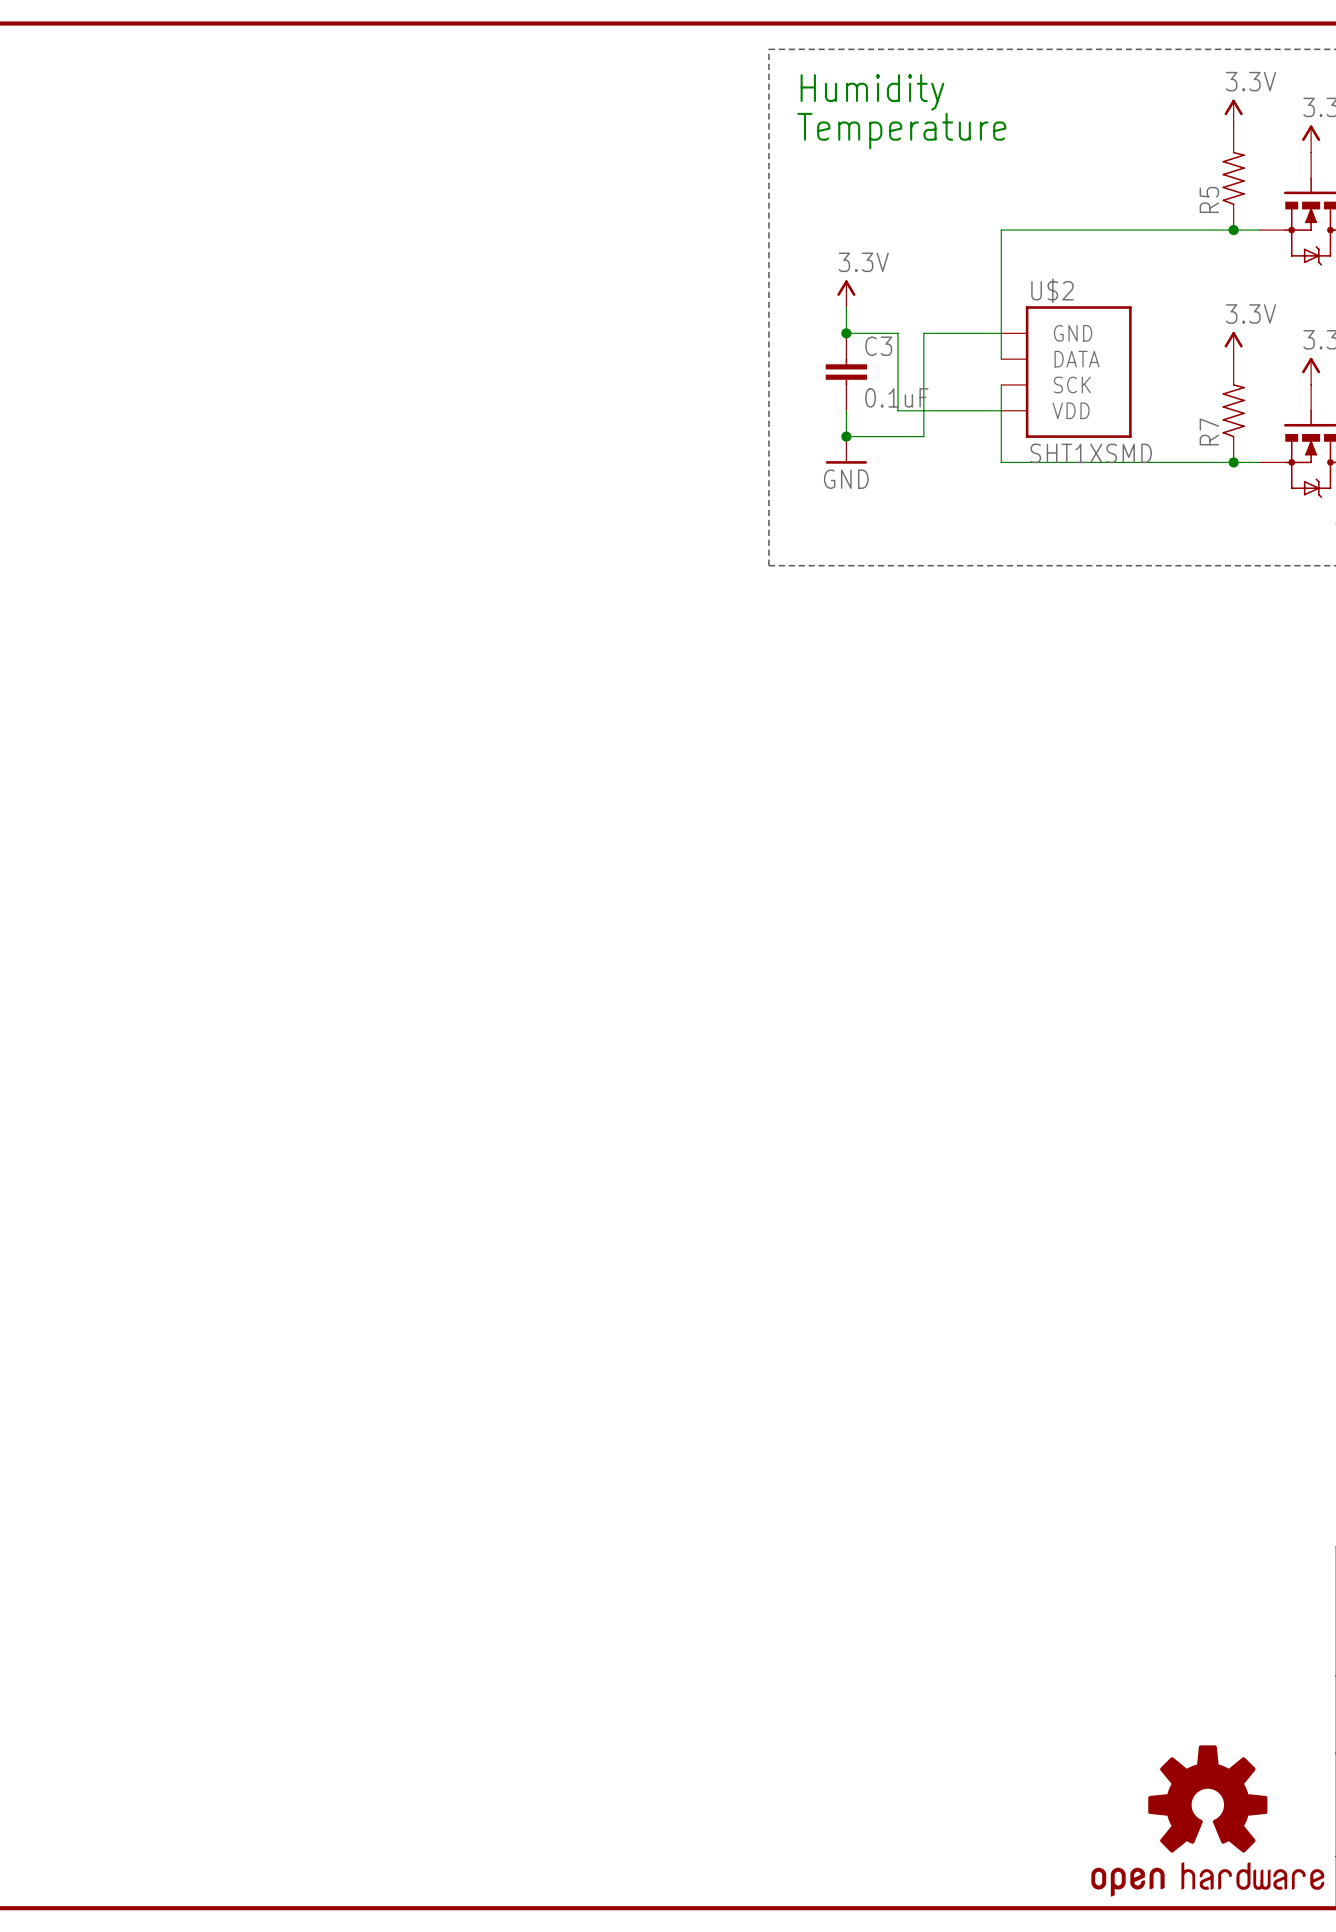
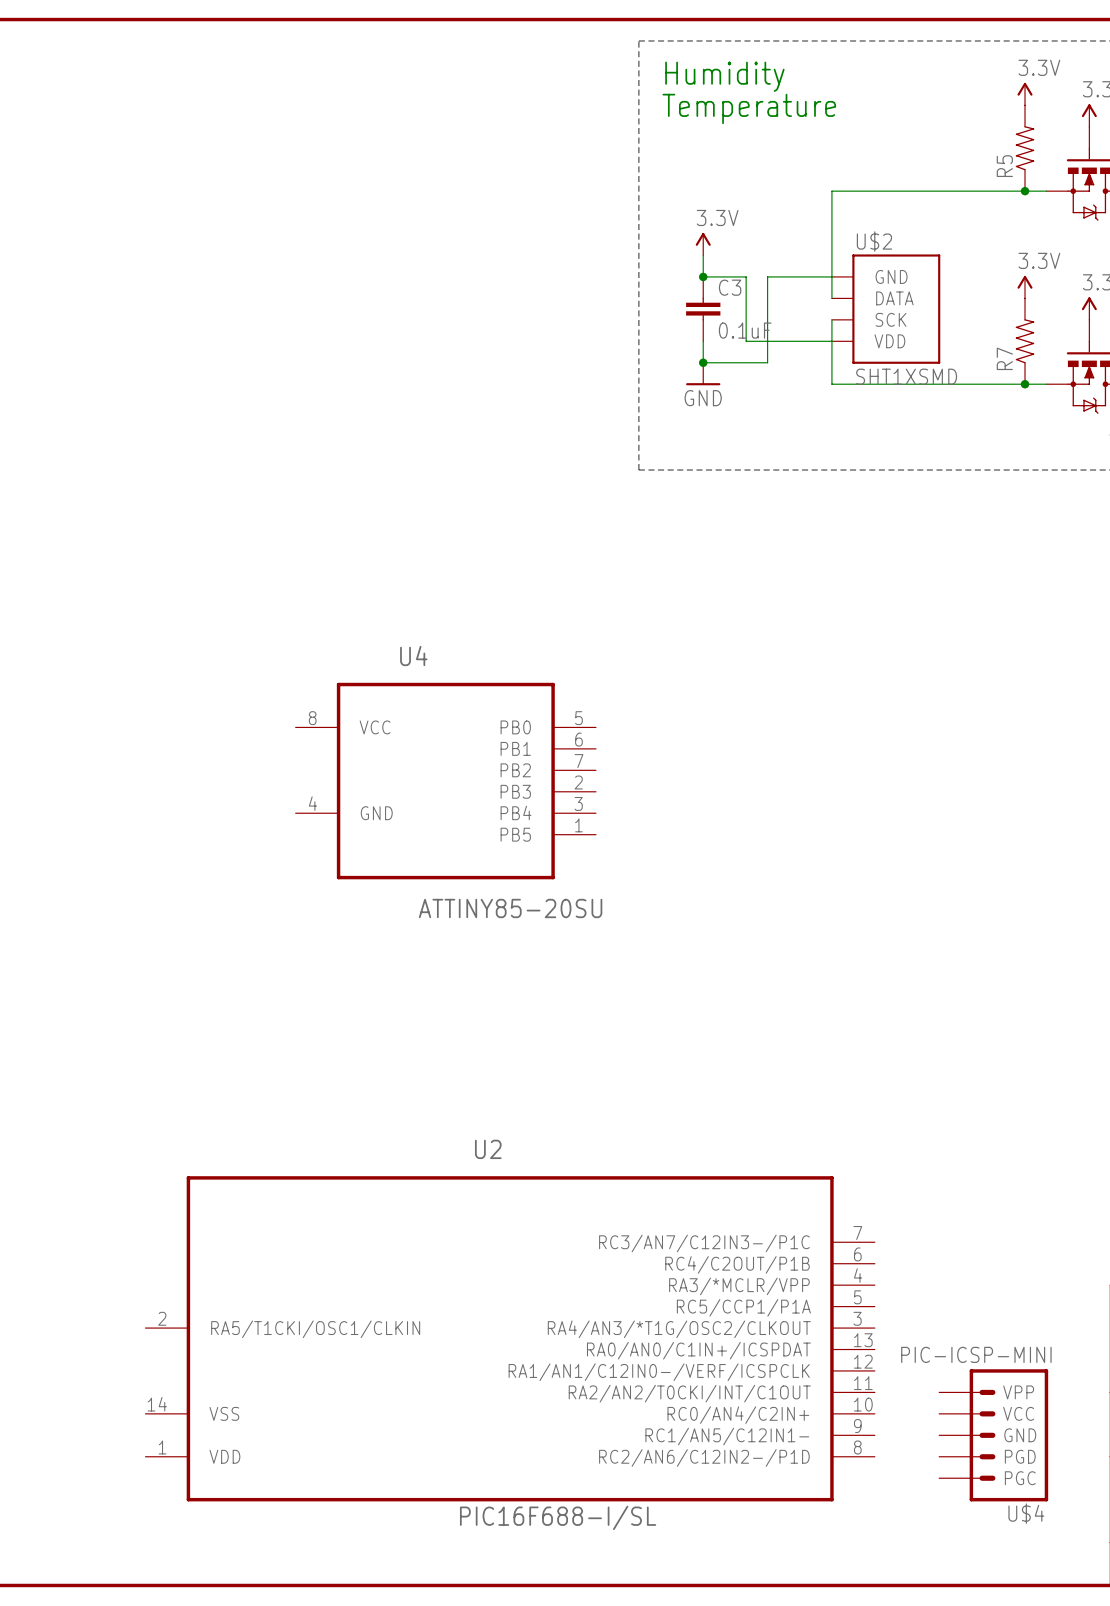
U4: none -> ATTINY85-20SU (445, 781)
U2: none -> PIC16F688-I/SL (510, 1338)
U$4: none -> PIC-ICSP-MINI (993, 1435)
part: (1207, 1820) -> none

